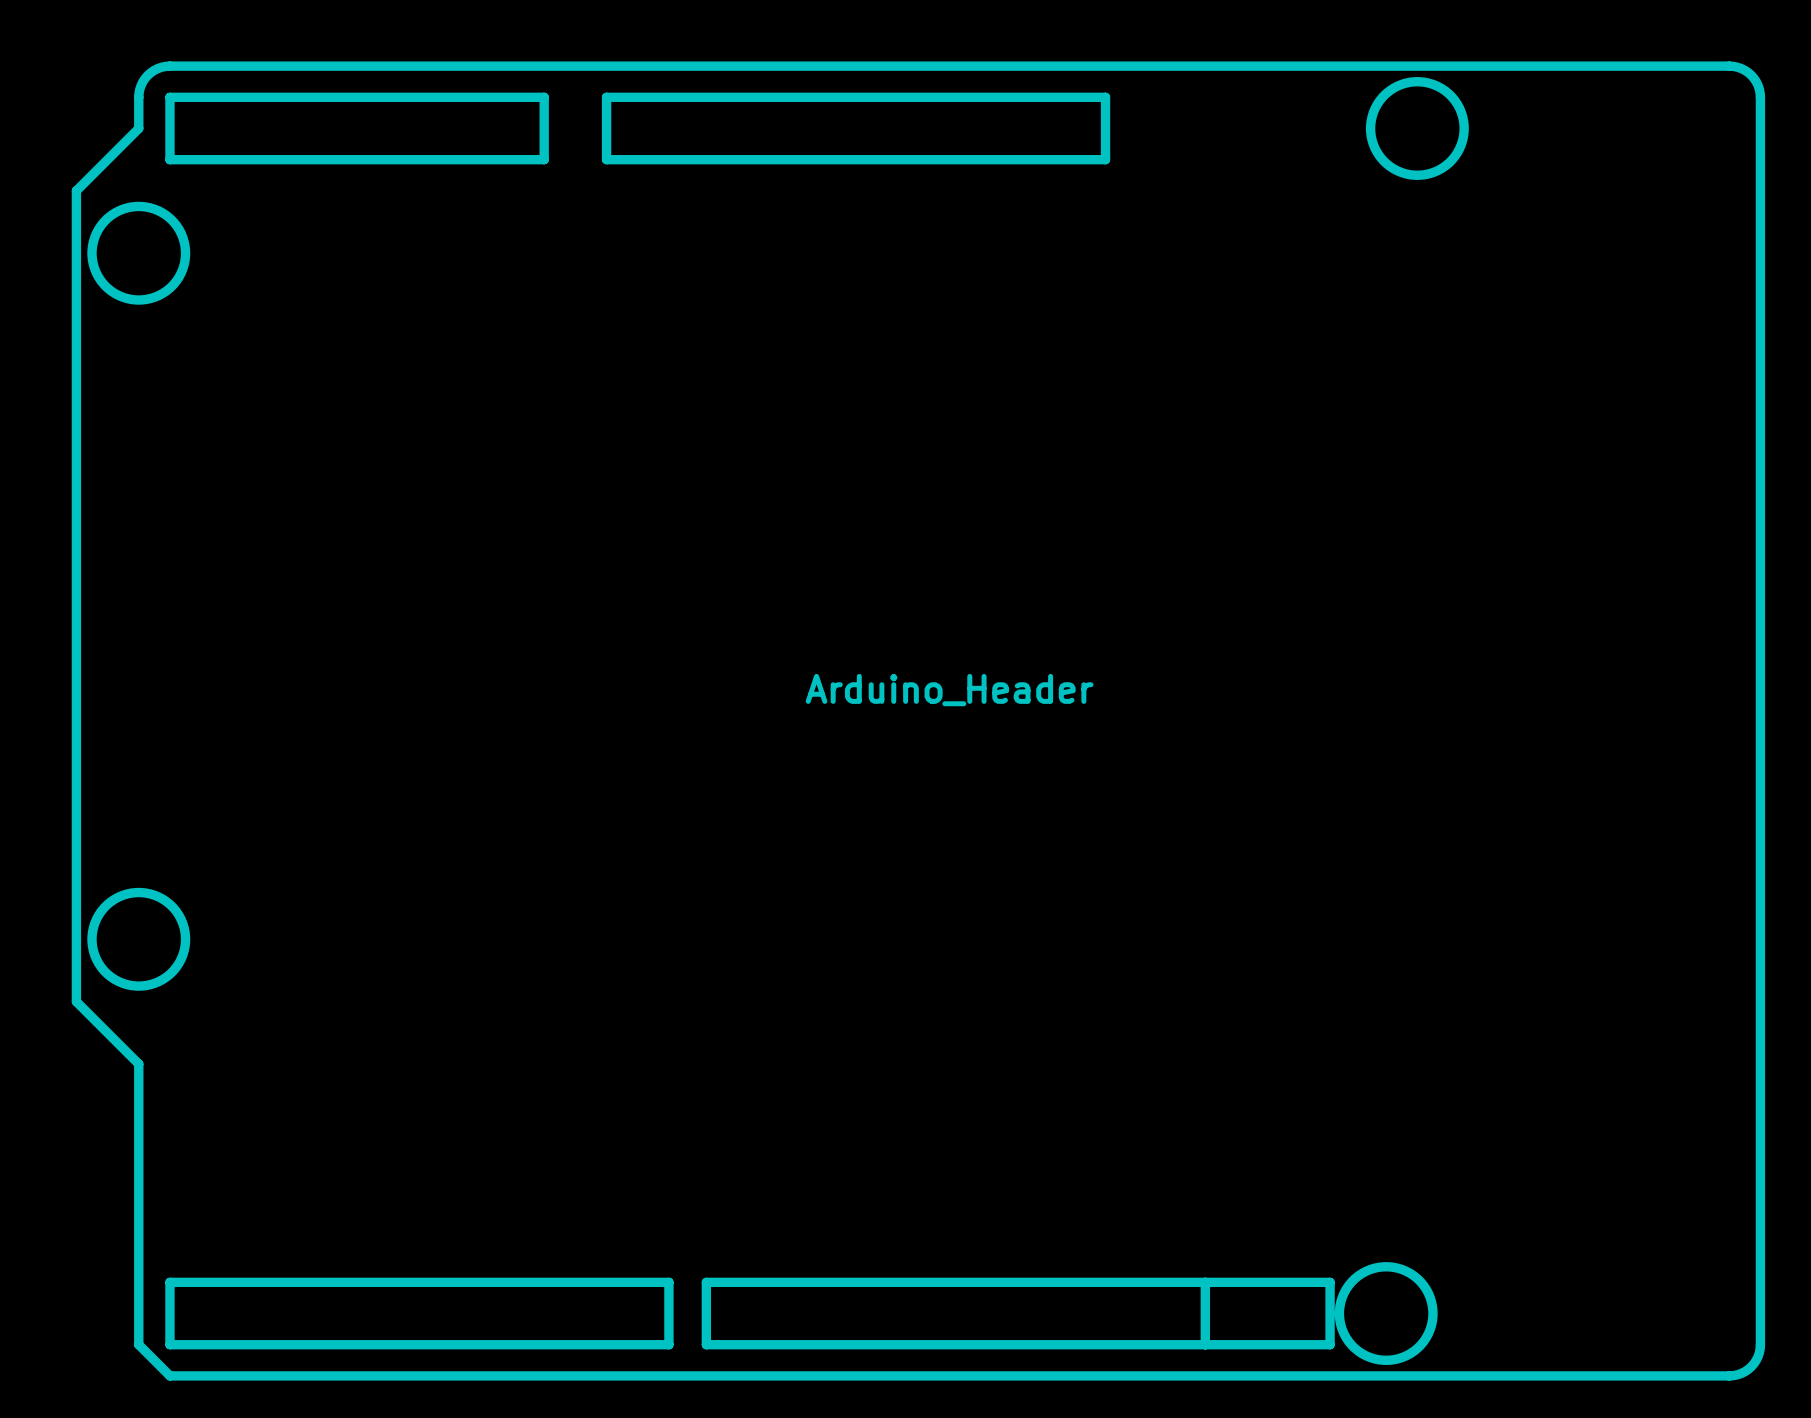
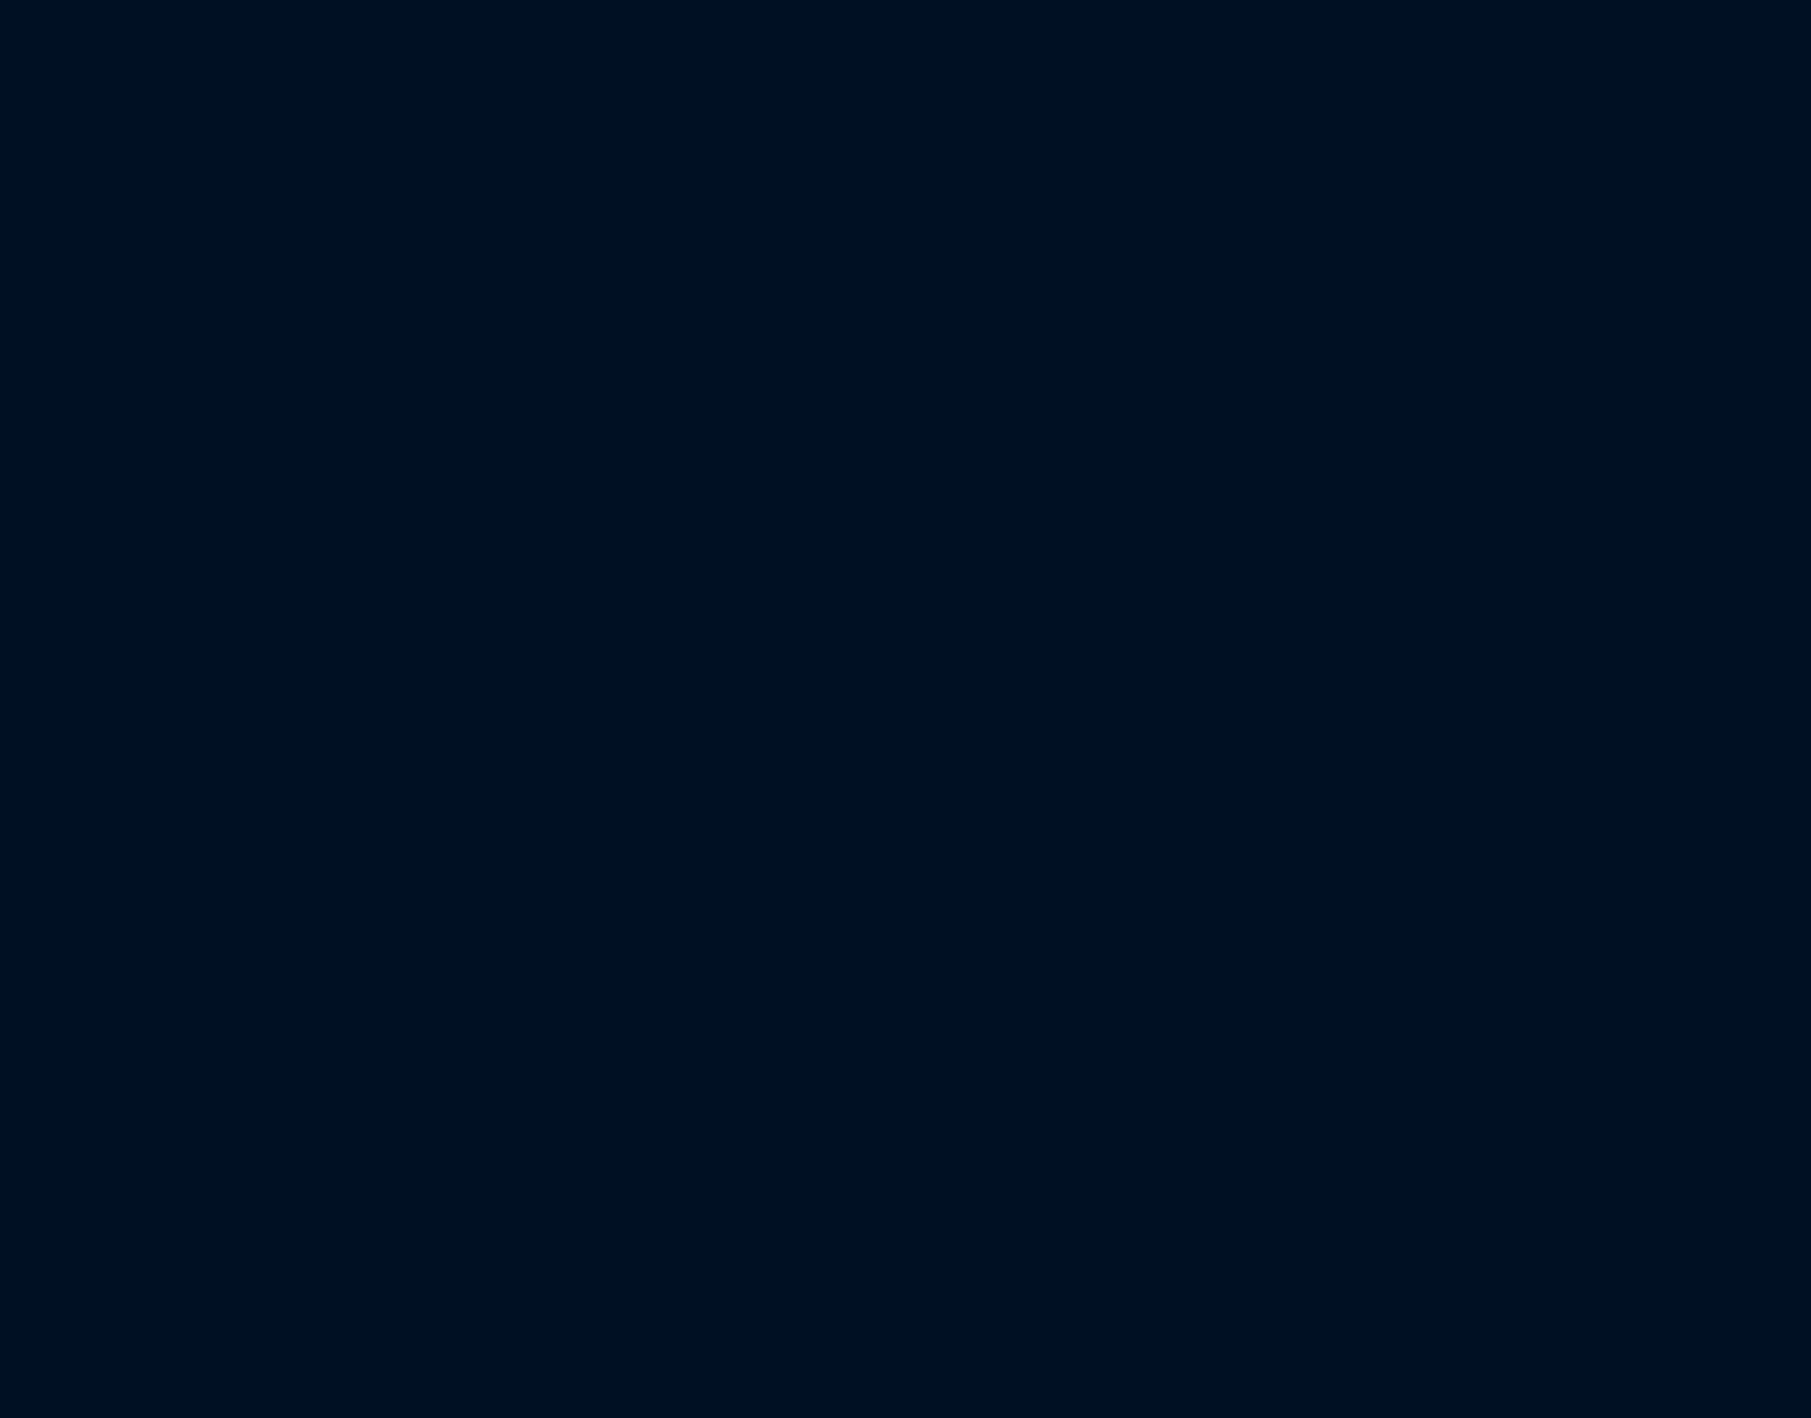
Arduino_Header: (918, 721) -> none

